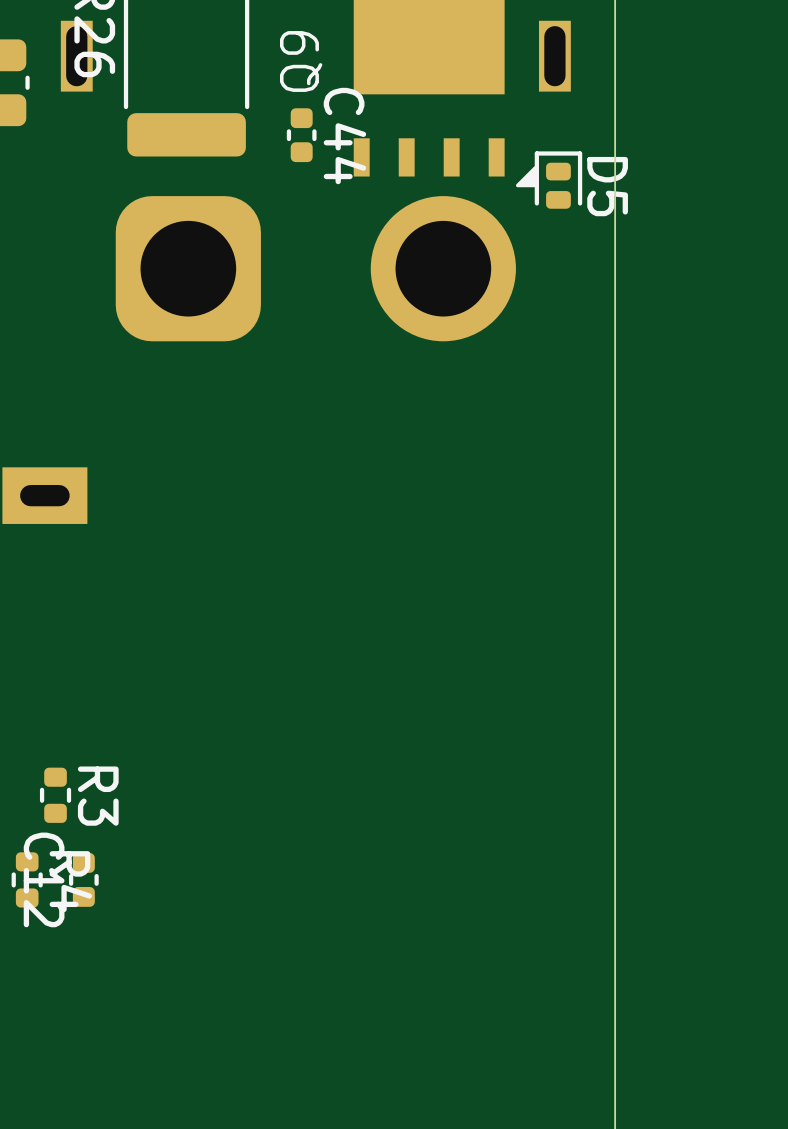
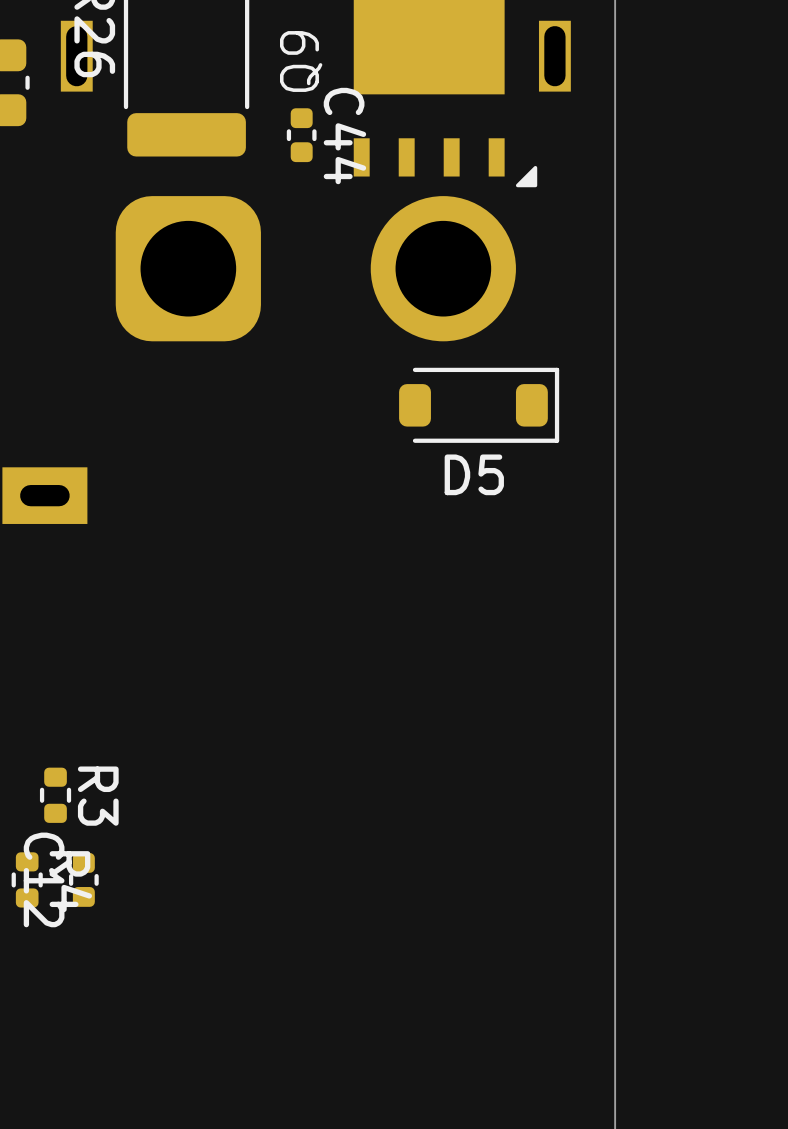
D5 footprint: [534, 151, 583, 209] -> [399, 367, 560, 443]
D5 name position: D5 (607, 186) -> D5 (474, 474)

